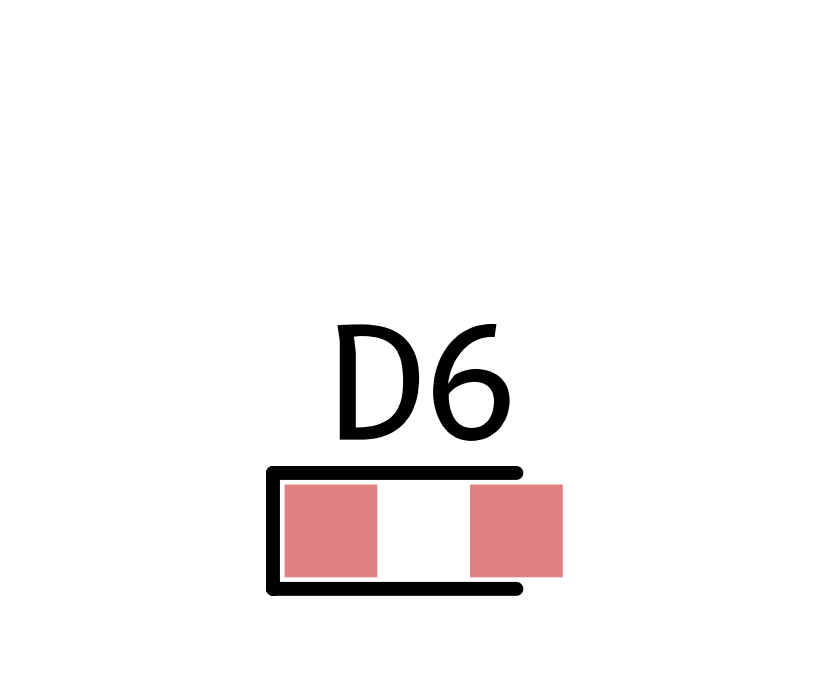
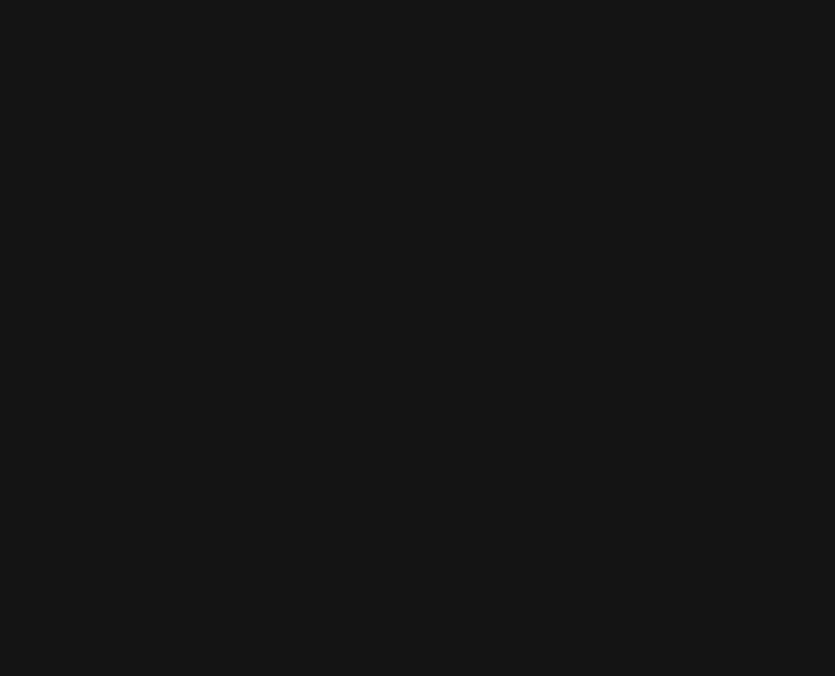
D6: (414, 530) -> none

